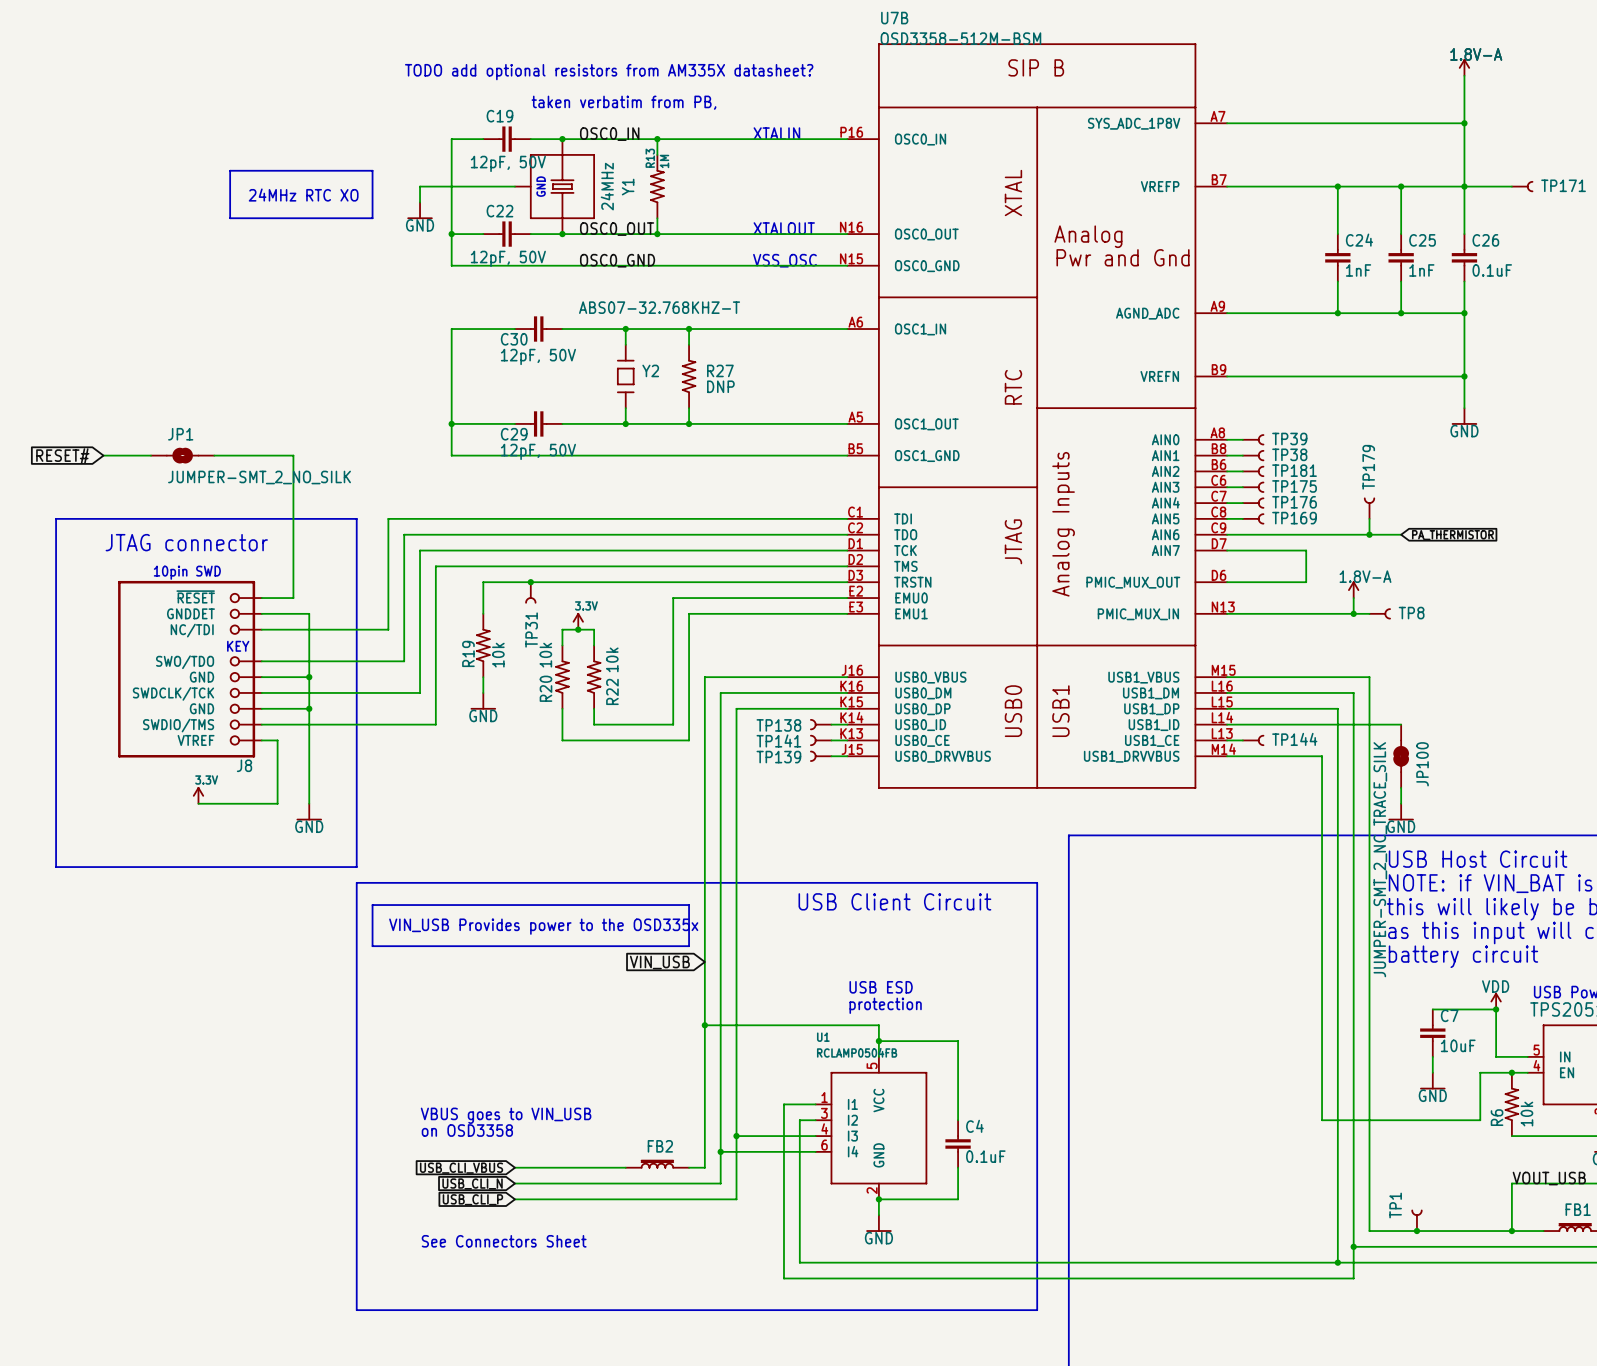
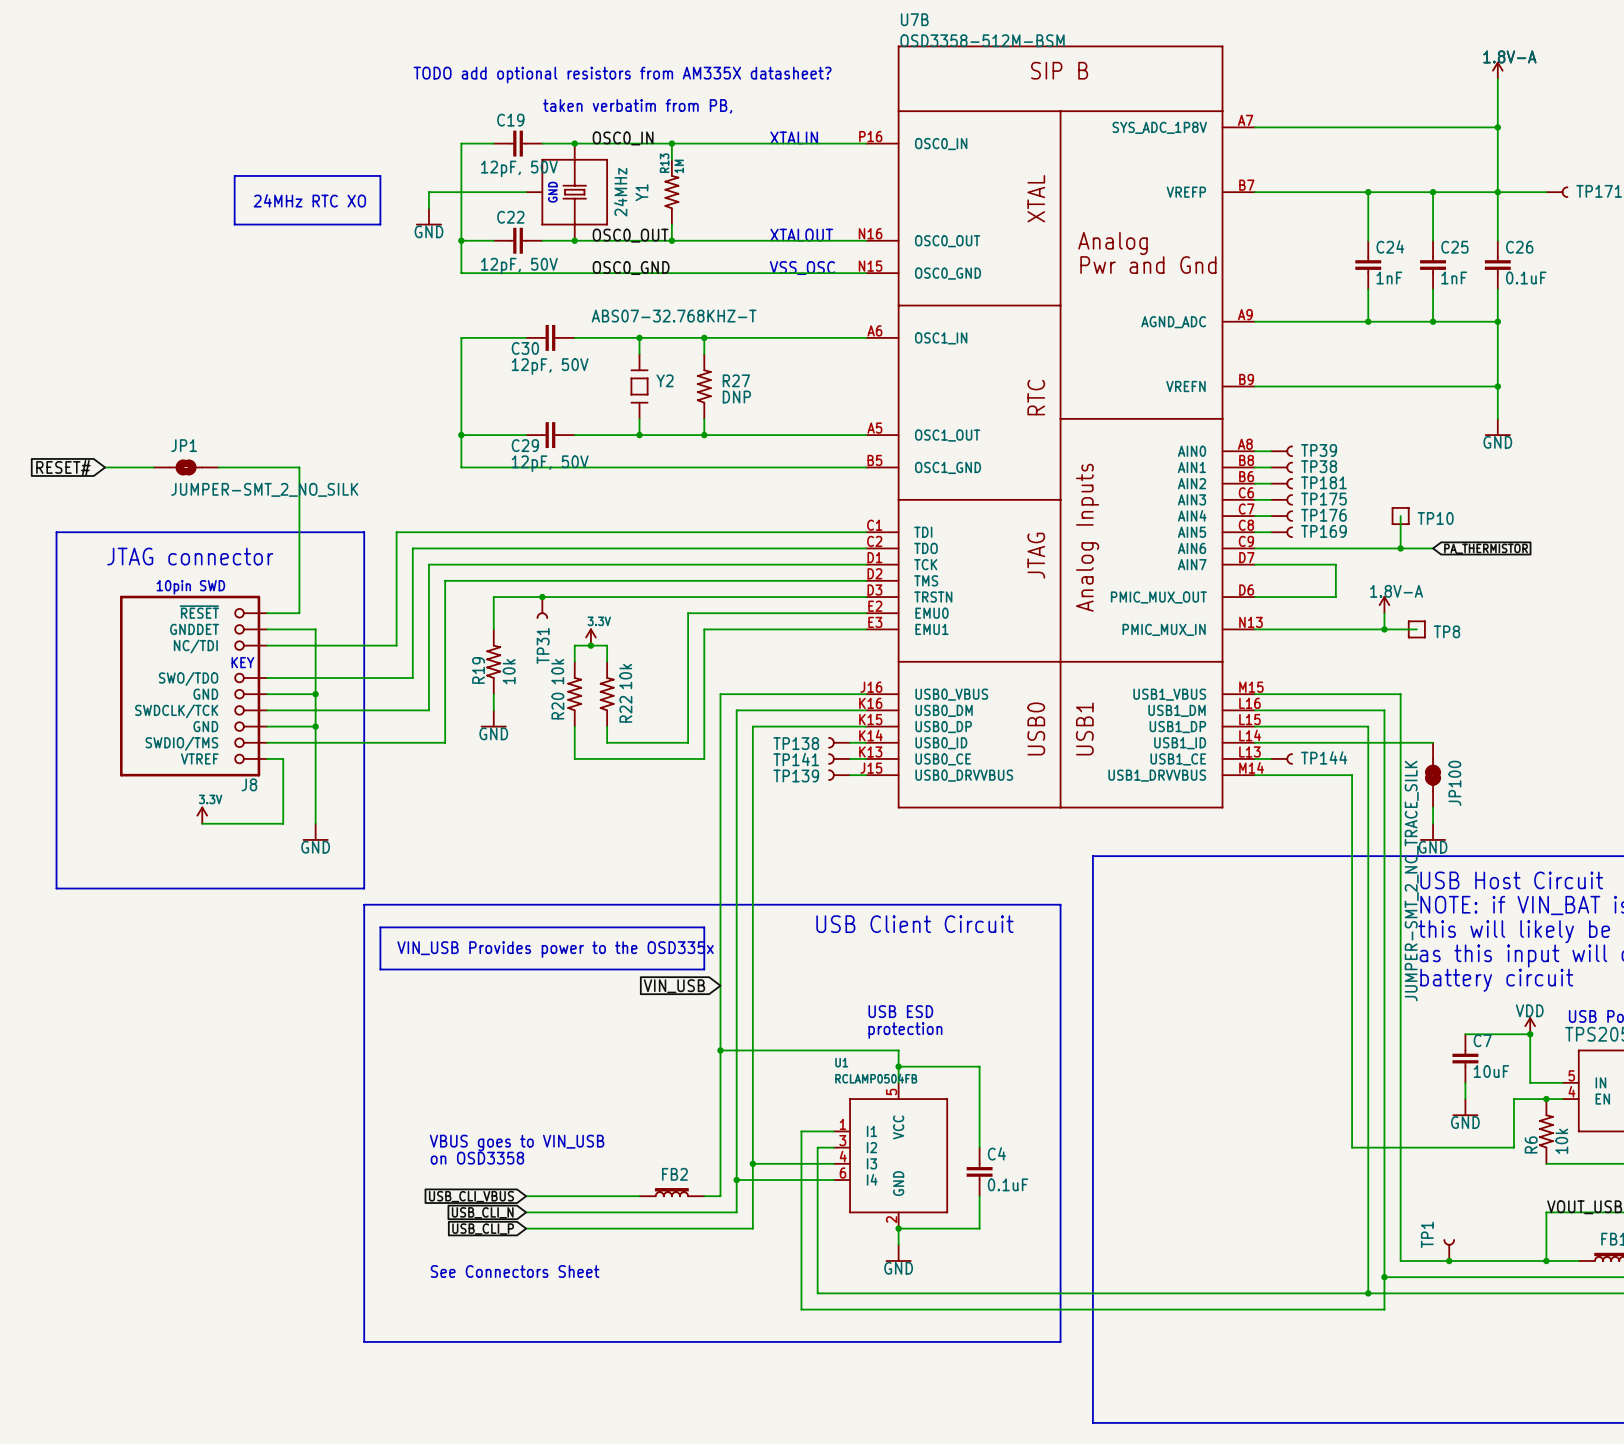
TP10: none -> (1400, 516)
TP179: (1369, 508) -> none
TP8 symbol: [1369, 608, 1391, 620] -> [1407, 620, 1426, 639]

